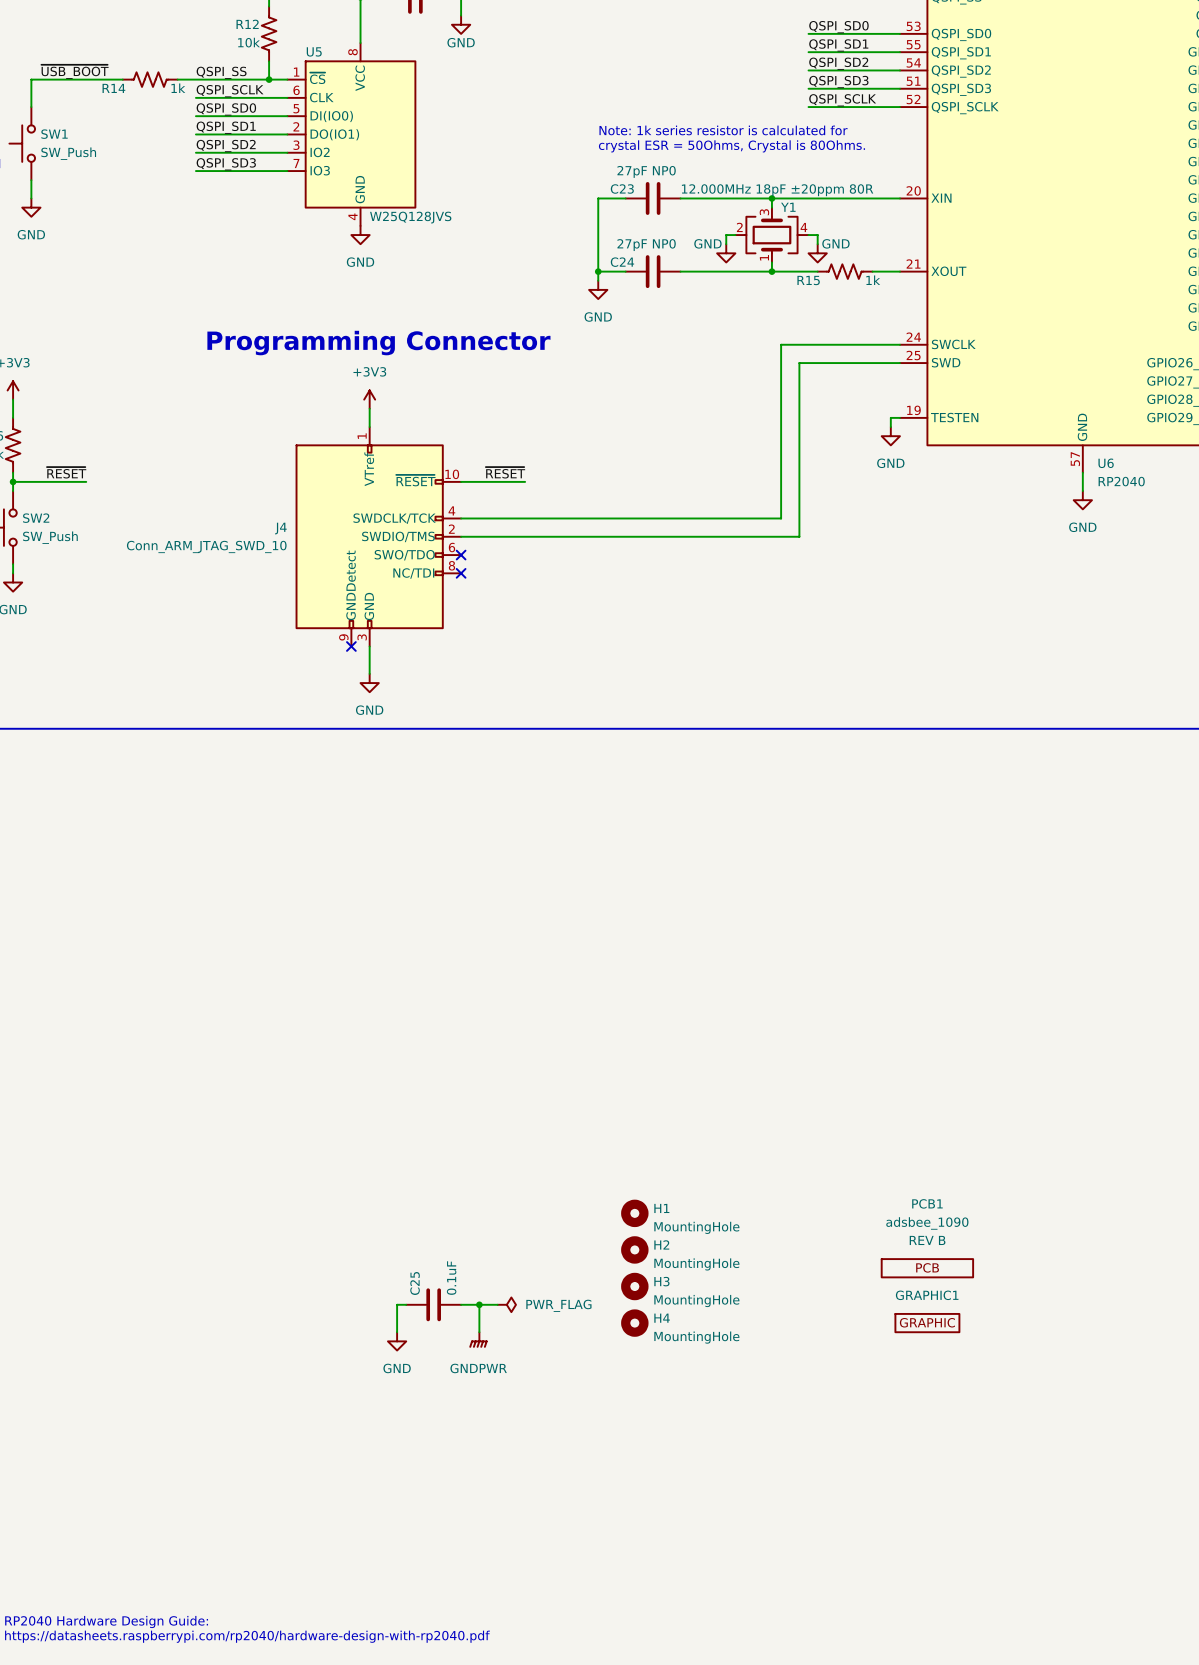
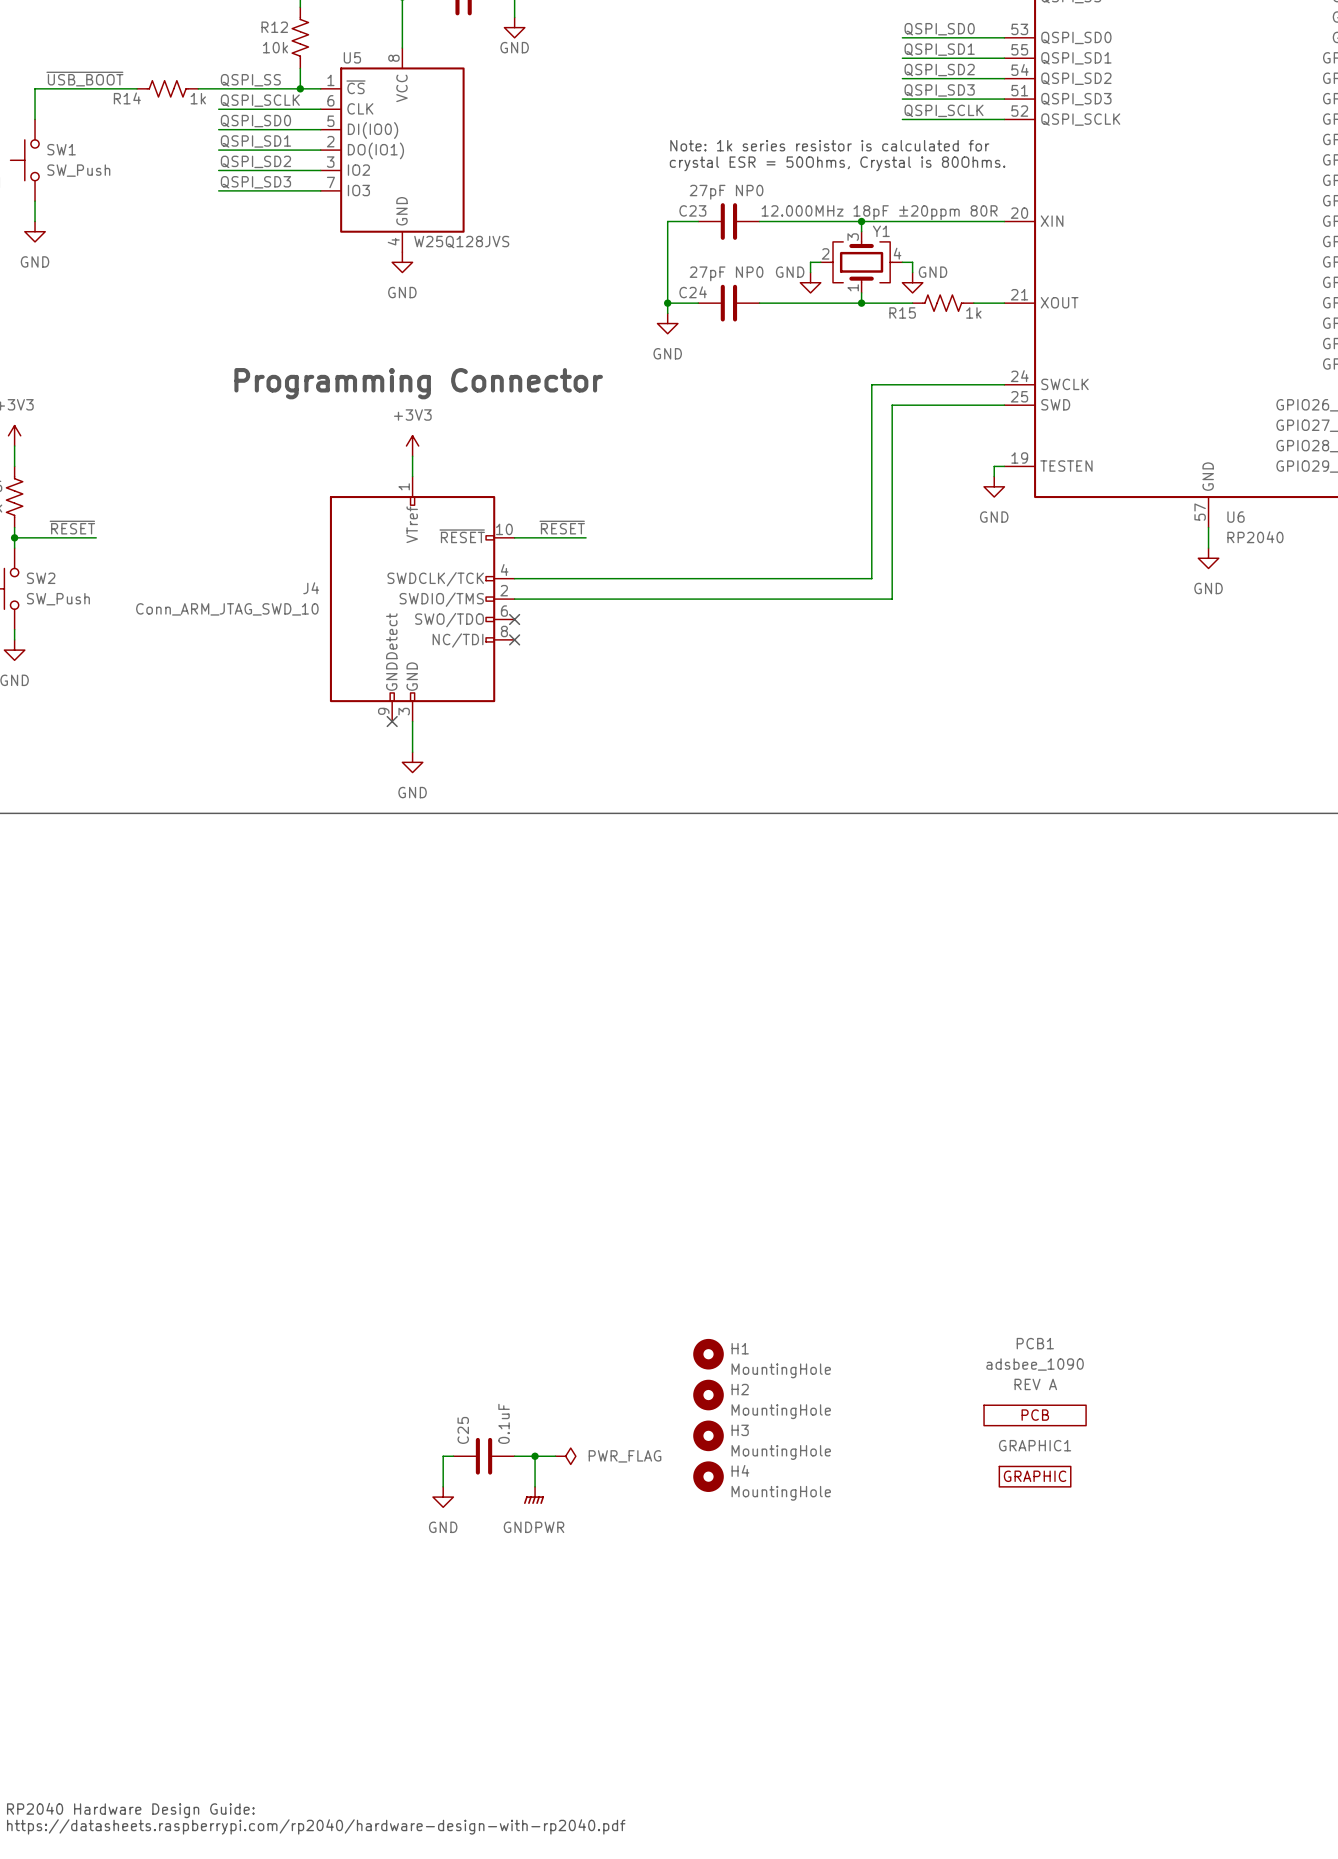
PCB1 text: REV B (927, 1240) -> REV A (1035, 1384)

